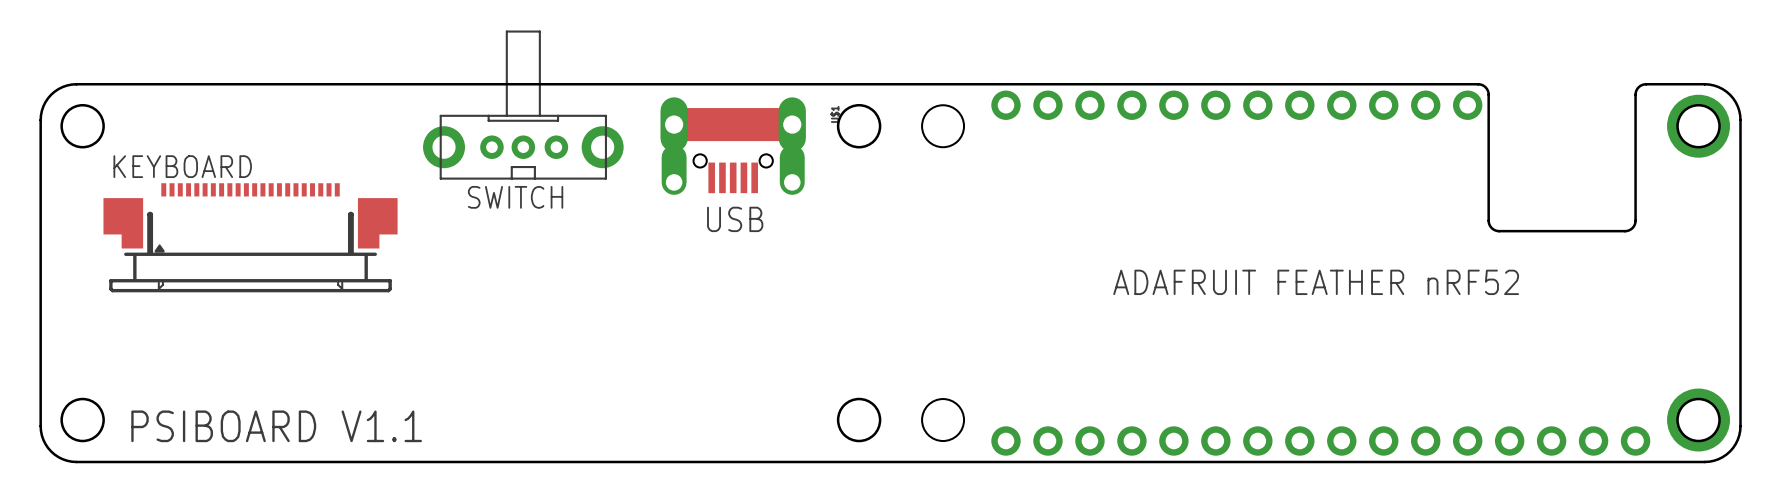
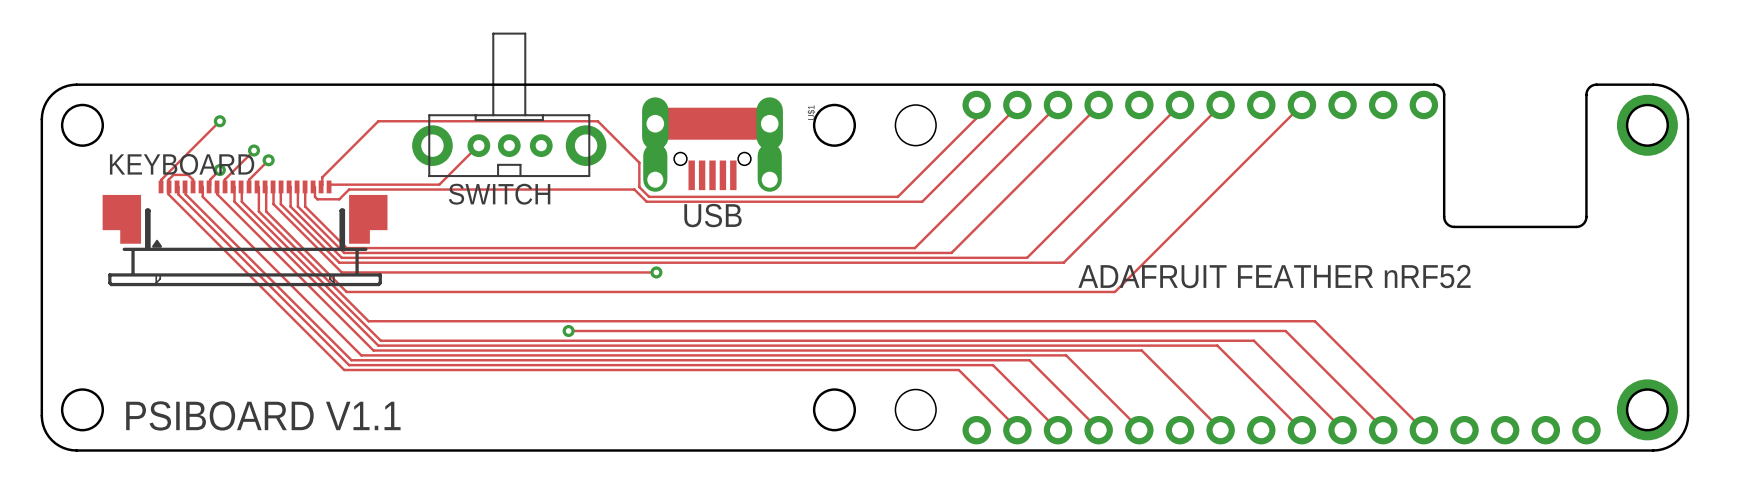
track: none -> (976, 104) (975, 118) (897, 196) (649, 196) (639, 187) (639, 162) (597, 121) (378, 121) (322, 177) (321, 186)
track: none -> (1017, 104) (922, 201) (646, 201) (634, 189) (349, 189) (339, 199) (317, 199) (314, 196) (314, 187) (313, 186)
track: none -> (1058, 104) (914, 248) (346, 248) (305, 206) (305, 187)
track: none -> (1098, 104) (951, 252) (344, 252) (297, 206) (297, 186)
track: none -> (1179, 104) (1027, 257) (341, 257) (290, 206) (289, 186)
track: none -> (1220, 104) (1063, 262) (339, 262) (280, 204) (280, 187)
track: none -> (1301, 104) (1114, 291) (346, 291) (266, 211) (265, 186)
track: none -> (219, 121) (161, 179) (161, 186)
via: none -> (219, 121)
track: none -> (478, 145) (439, 184) (329, 184) (329, 186)
track: none -> (254, 150) (224, 179) (225, 186)
via: none -> (254, 150)
track: none -> (268, 160) (249, 179) (249, 186)
via: none -> (268, 160)
track: none -> (219, 170) (210, 179) (209, 186)
via: none -> (219, 170)
track: none -> (177, 186) (178, 194) (349, 365) (992, 365) (1058, 430)
track: none -> (185, 186) (185, 194) (351, 360) (1029, 360) (1098, 430)
track: none -> (193, 186) (193, 179) (188, 174) (173, 174) (168, 179) (168, 194) (344, 370) (958, 370) (1017, 430)
track: none -> (201, 186) (202, 187) (202, 196) (361, 355) (1066, 355) (1139, 430)
track: none -> (217, 186) (217, 194) (373, 350) (1141, 350) (1220, 430)
track: none -> (233, 186) (234, 201) (378, 345) (1217, 345) (1301, 430)
track: none -> (241, 186) (241, 201) (380, 340) (1253, 340) (1342, 430)
track: none -> (257, 186) (258, 187) (258, 211) (368, 321) (1314, 321) (1423, 430)
track: none -> (273, 186) (273, 204) (341, 272) (656, 272)
via: none -> (656, 272)
track: none -> (568, 330) (1285, 330) (1383, 430)
via: none -> (568, 330)

